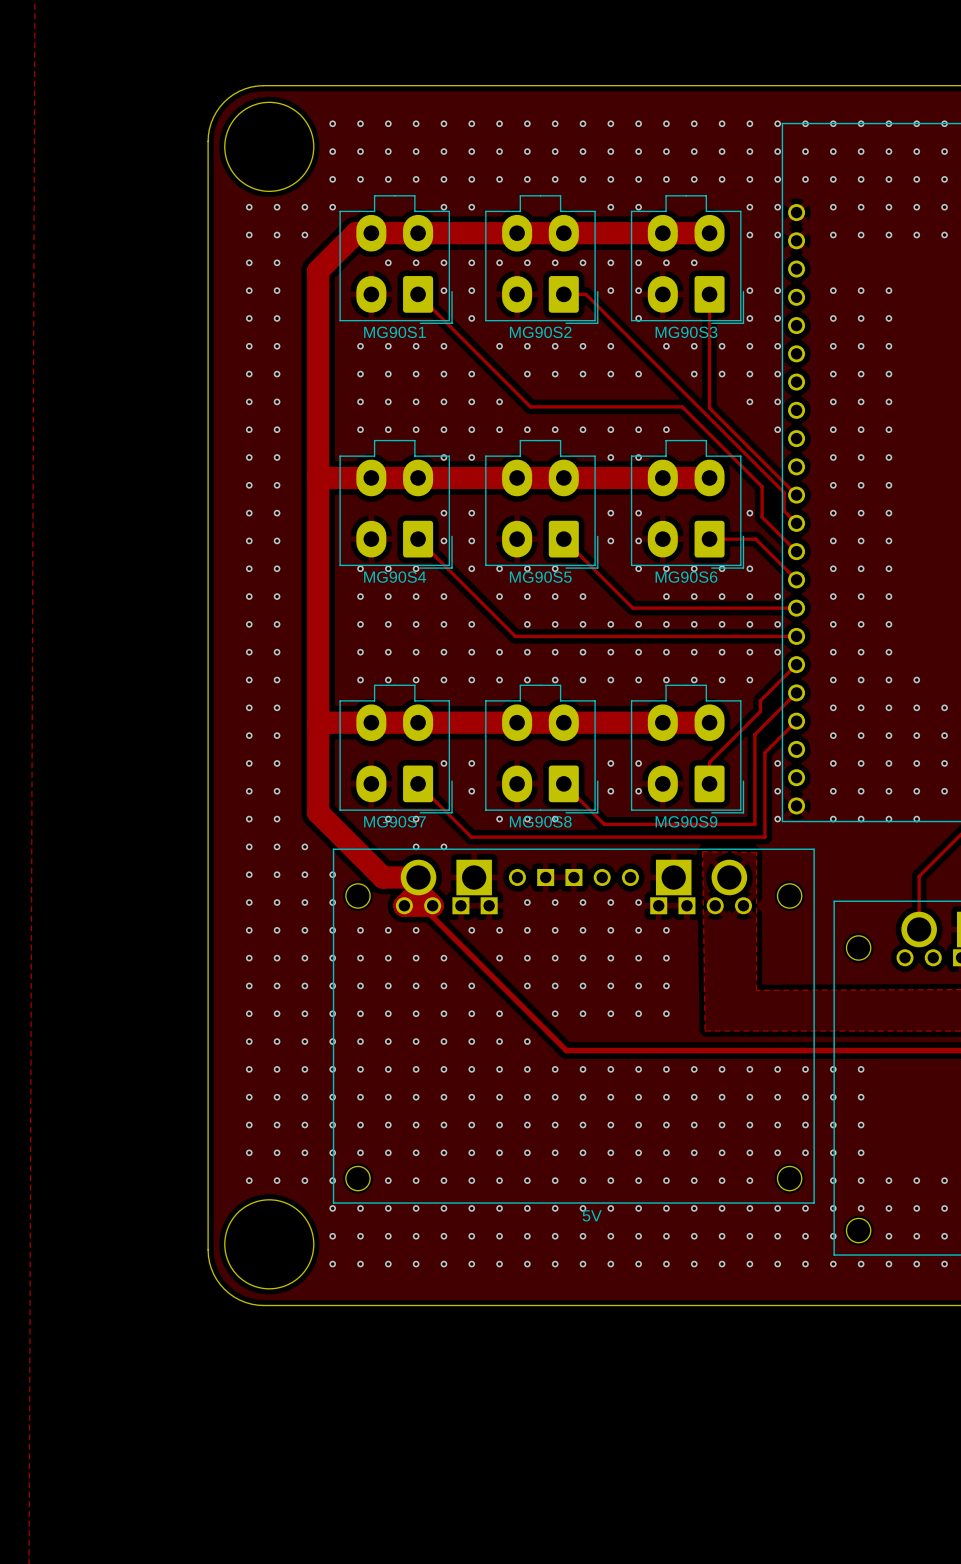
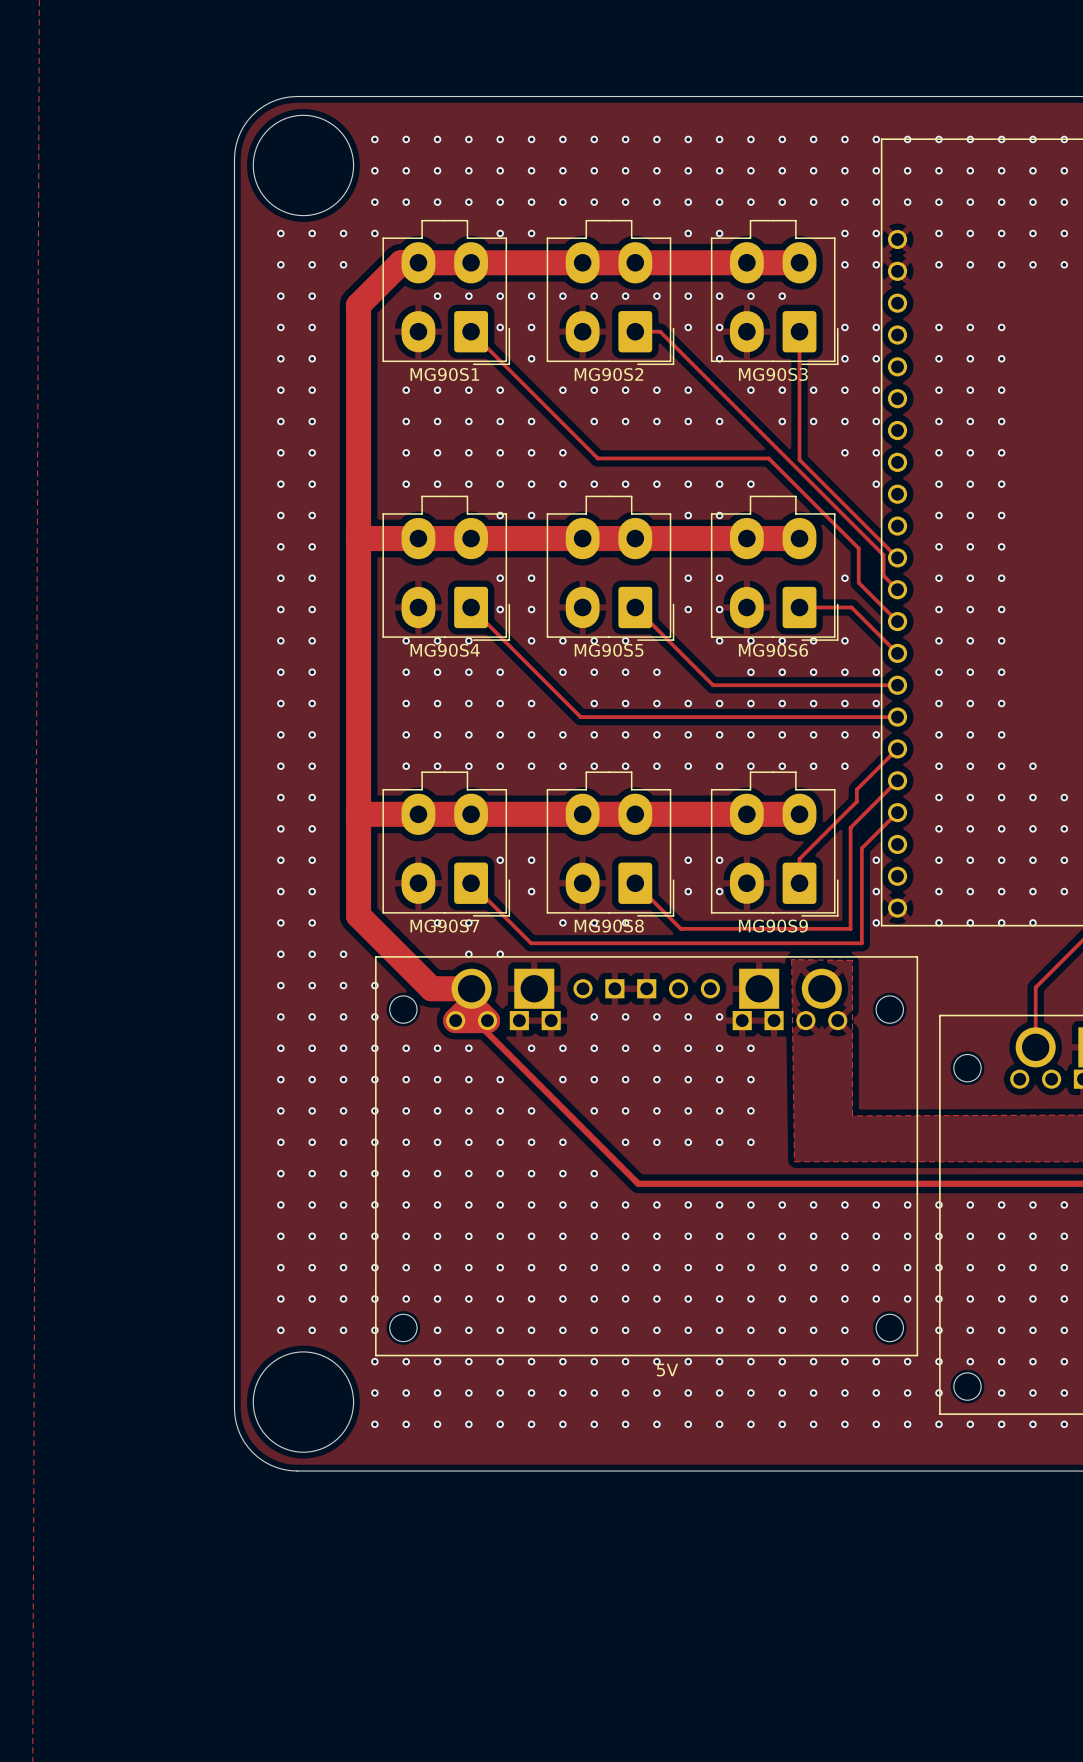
via: none -> (1001, 1204)
via: none -> (1032, 1204)
via: none -> (1064, 1204)
via: none -> (1001, 1236)
via: none -> (1032, 1236)
via: none -> (1064, 1236)
via: none -> (1001, 1267)
via: none -> (1032, 1267)
via: none -> (1064, 1267)
via: none -> (1001, 1298)
via: none -> (1032, 1298)
via: none -> (1064, 1298)

